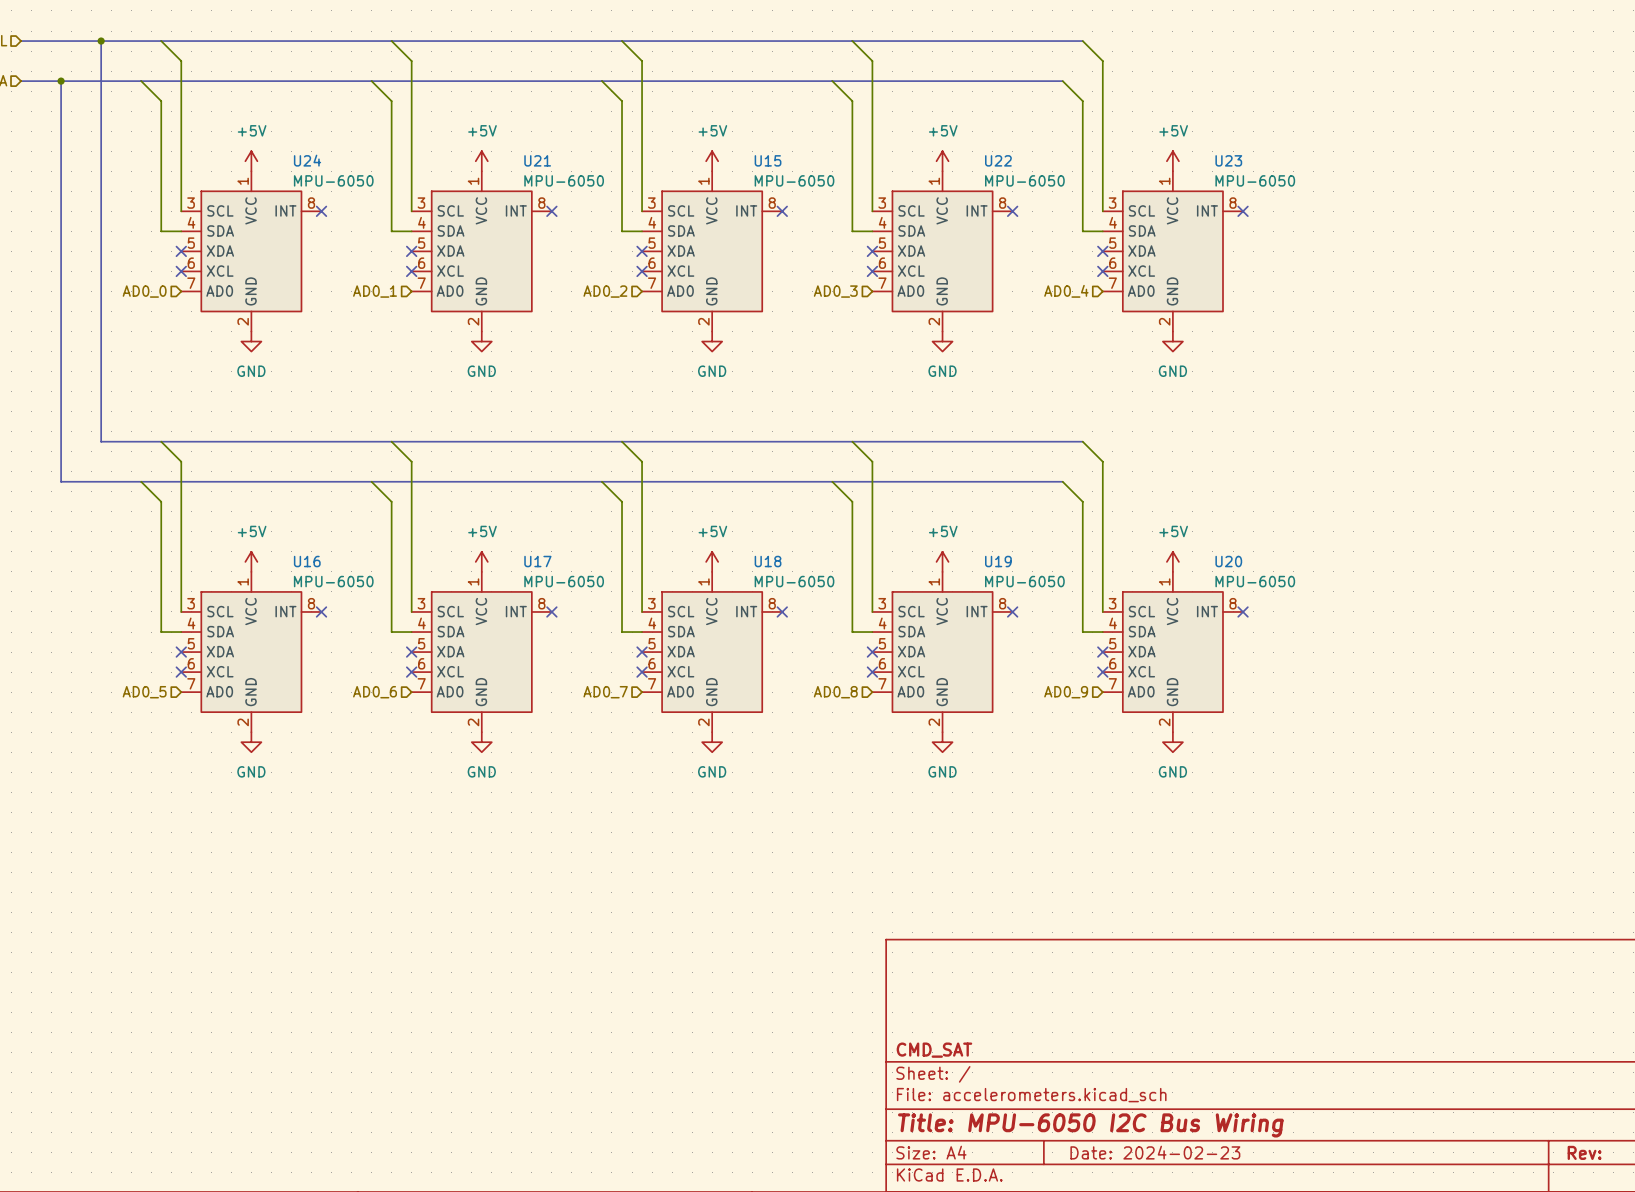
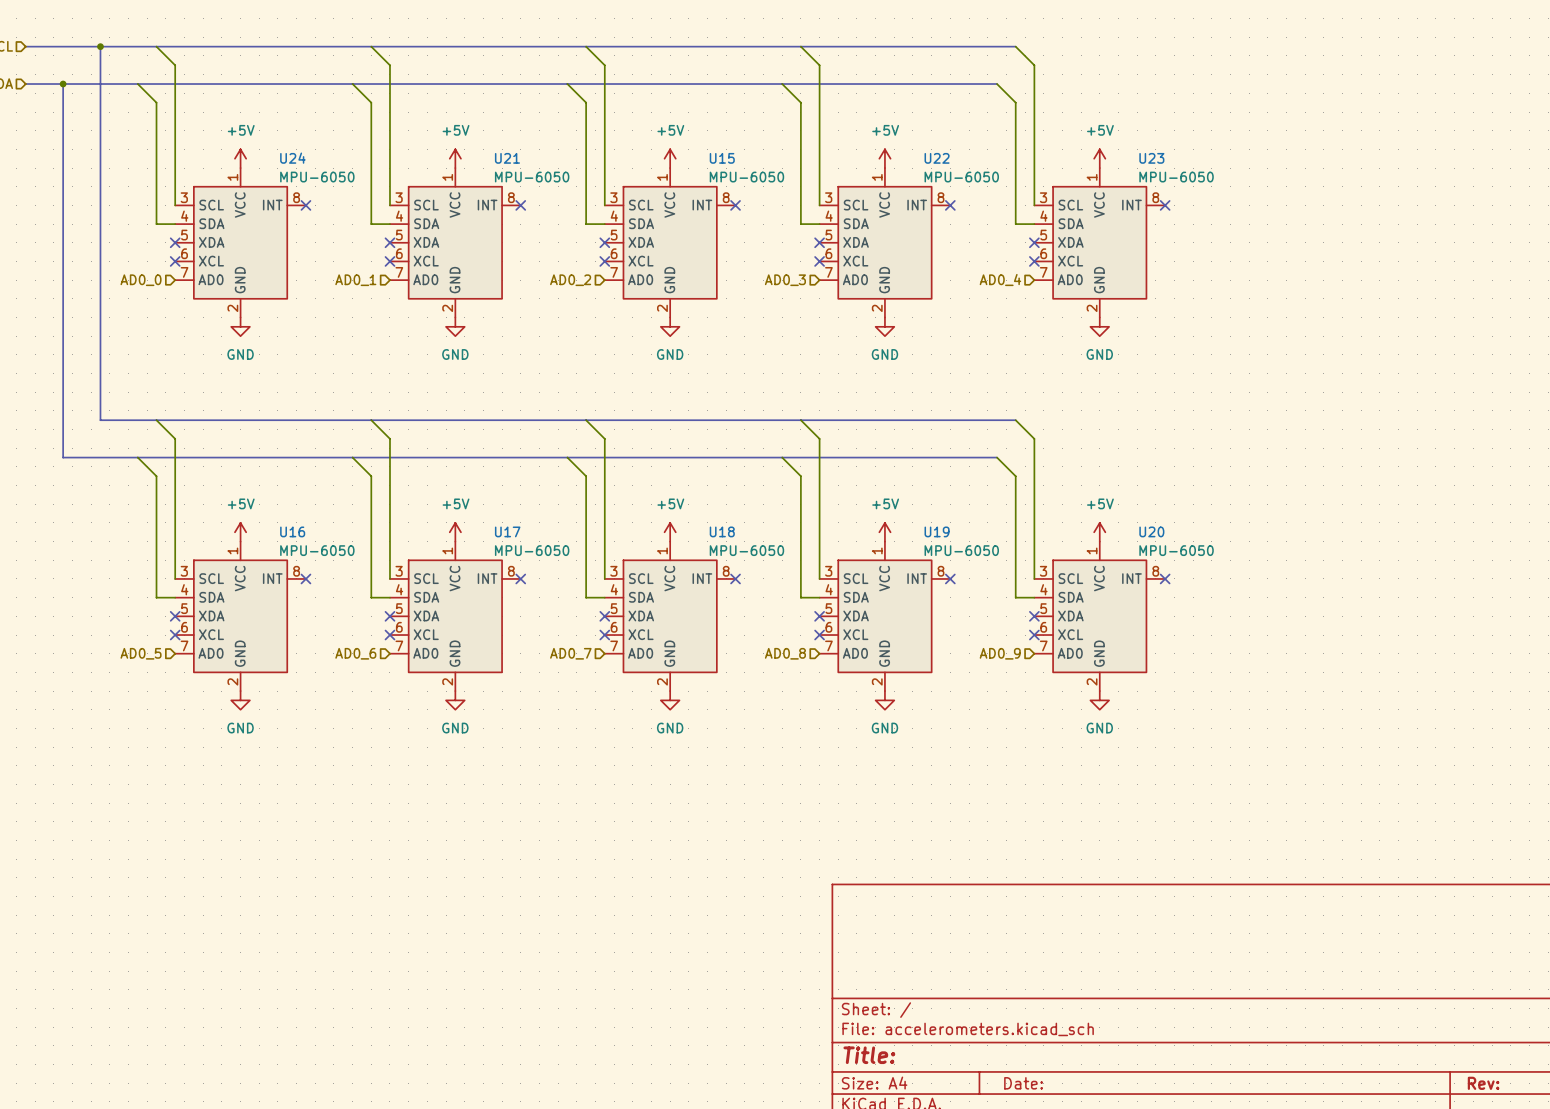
title block: CMD_SAT (934, 1050) -> none
title block: Title: MPU-6050 I2C Bus Wiring (1090, 1125) -> Title: (869, 1055)
title block: Date: 2024-02-23 (1155, 1152) -> Date: (1023, 1083)

